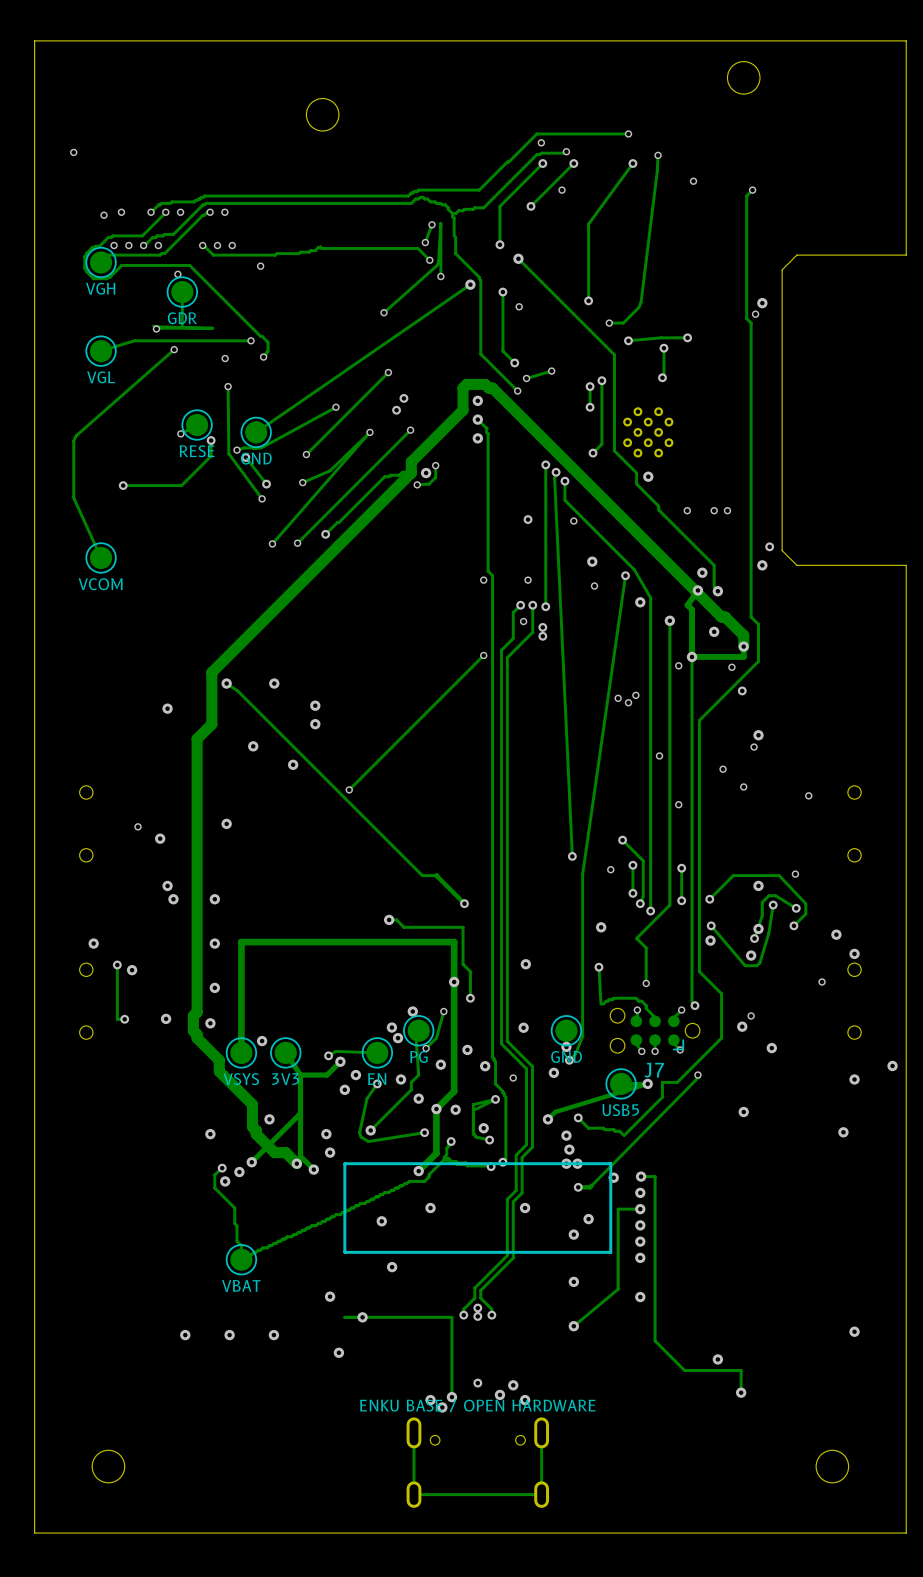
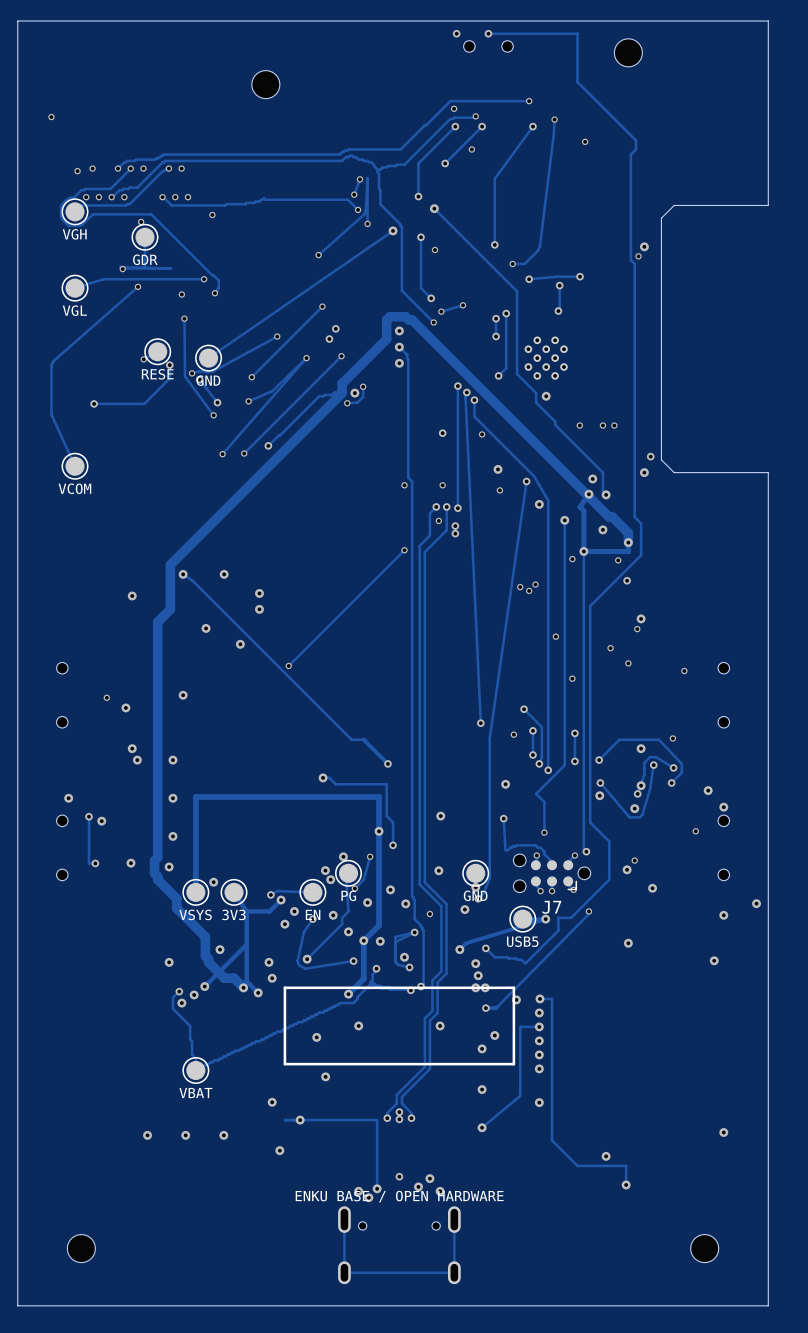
via: none -> (456, 33)
track: none -> (488, 33) (577, 33) (577, 82) (636, 140) (636, 149)
via: none -> (488, 33)
part: none -> (488, 46)
via: (752, 190) -> none

